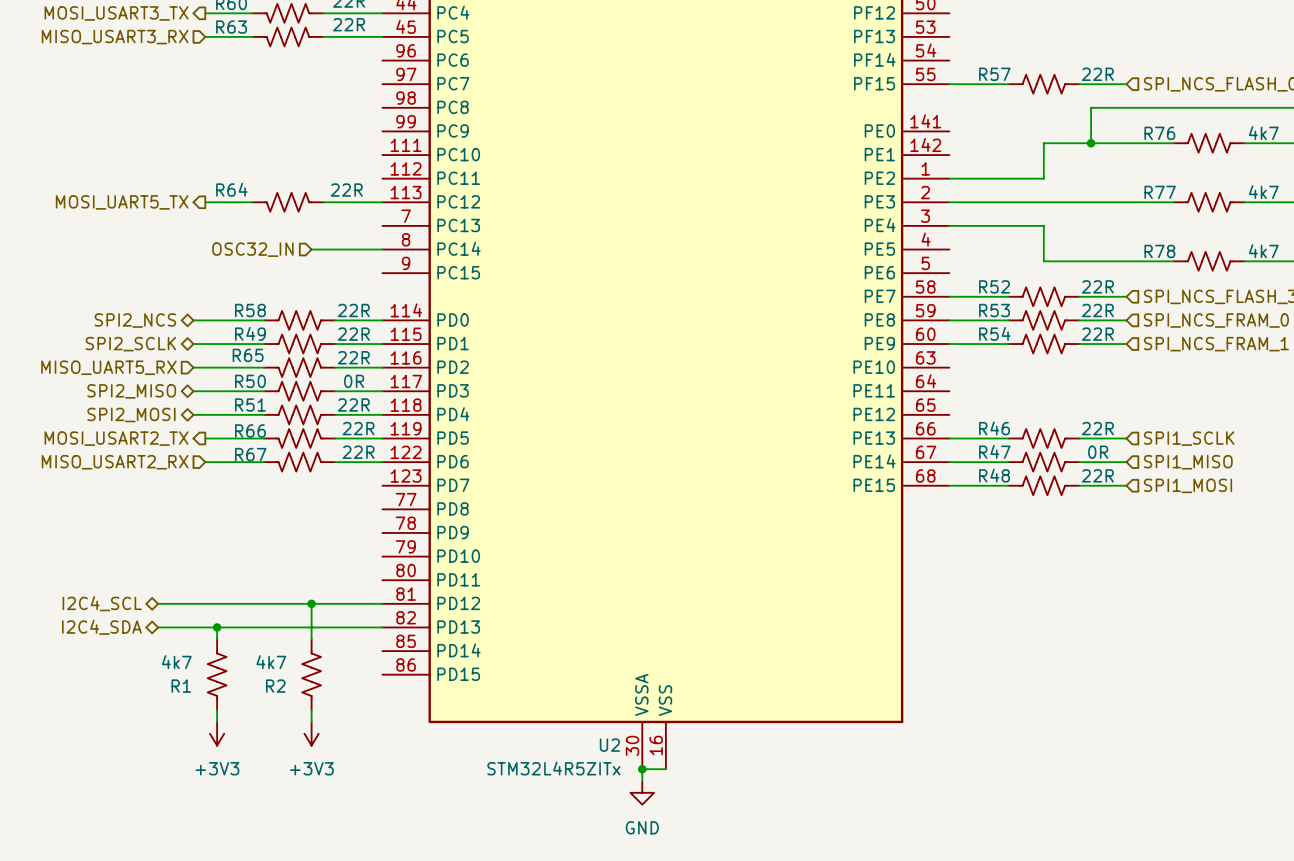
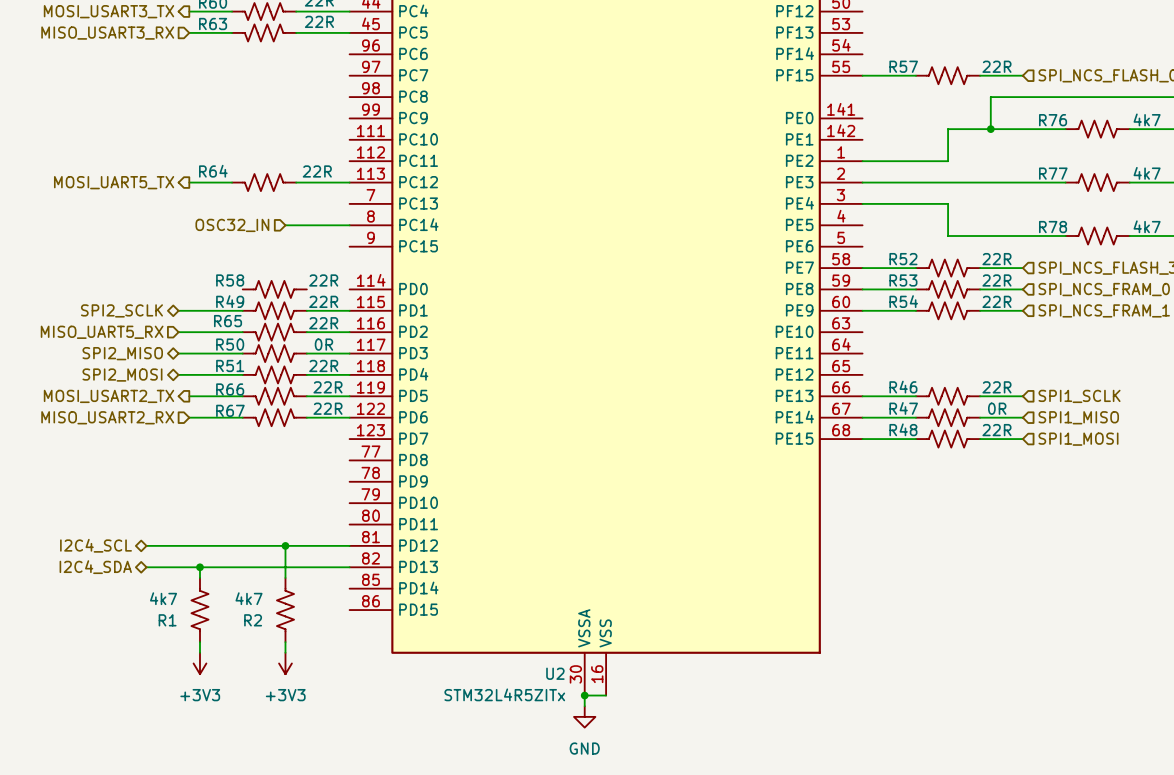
hierarchical label: SPI2_NCS (135, 320) -> none
wire: (193, 320) (264, 320) -> none
wire: (335, 320) (382, 320) -> none

